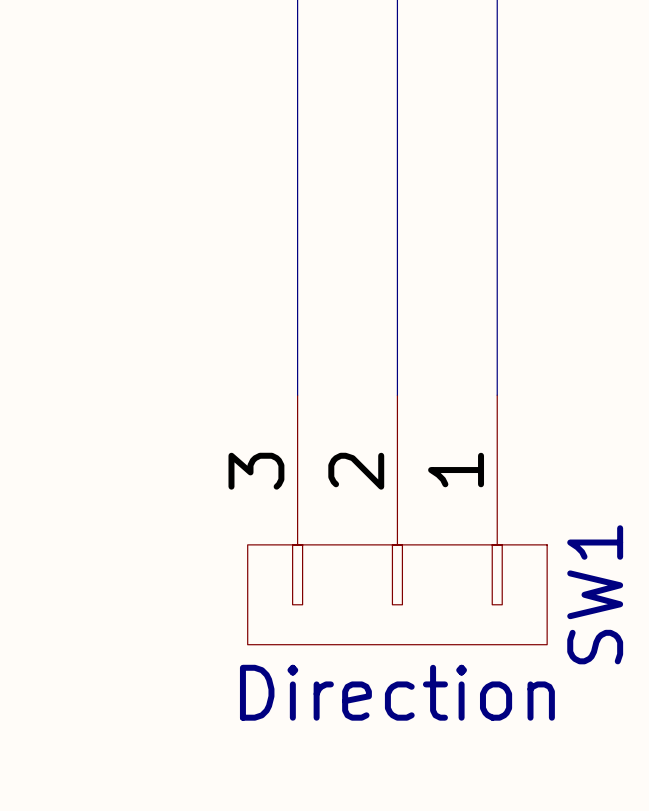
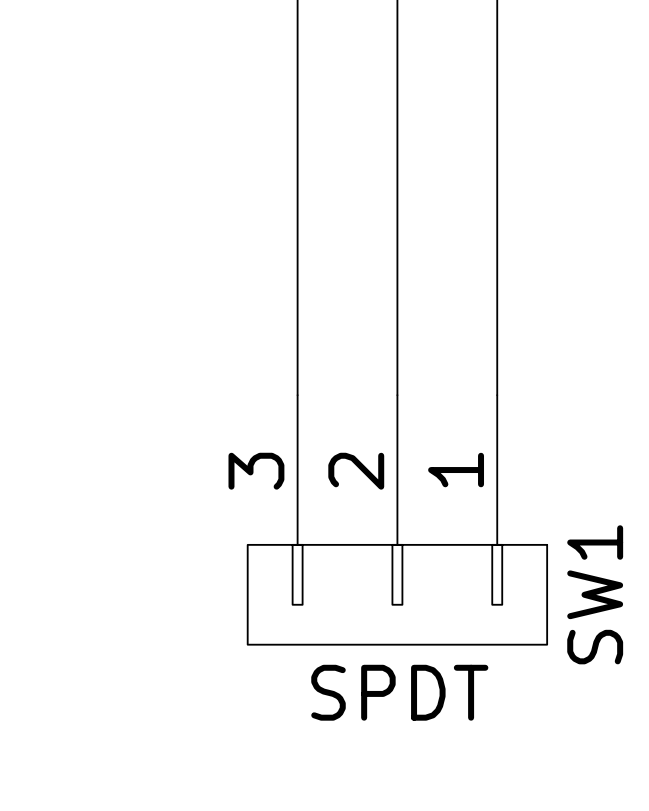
SW1 value: Direction (397, 692) -> SPDT (399, 692)

